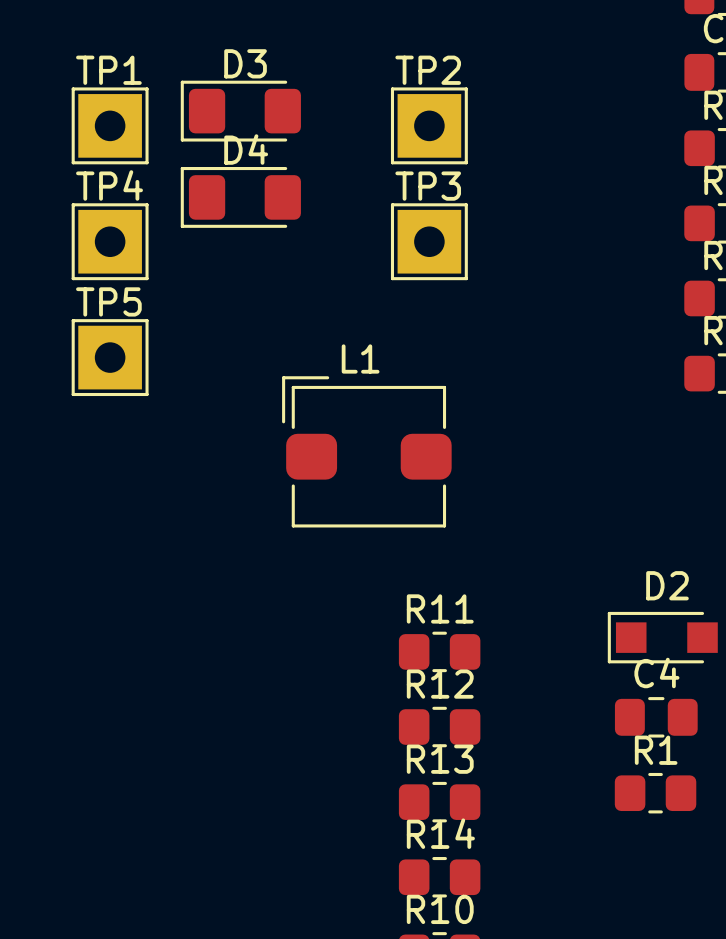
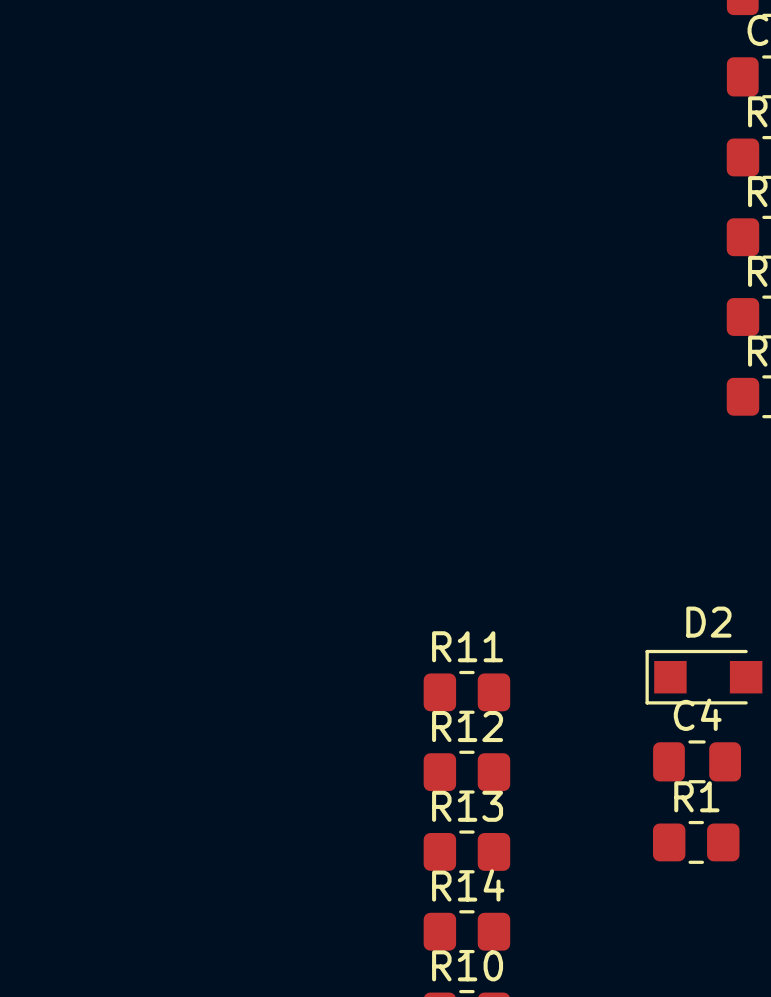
D3: (240, 111) -> none
TP1: (110, 125) -> none
TP2: (429, 125) -> none
D4: (240, 197) -> none
TP4: (110, 241) -> none
TP3: (429, 241) -> none
TP5: (110, 357) -> none
L1: (366, 451) -> none

